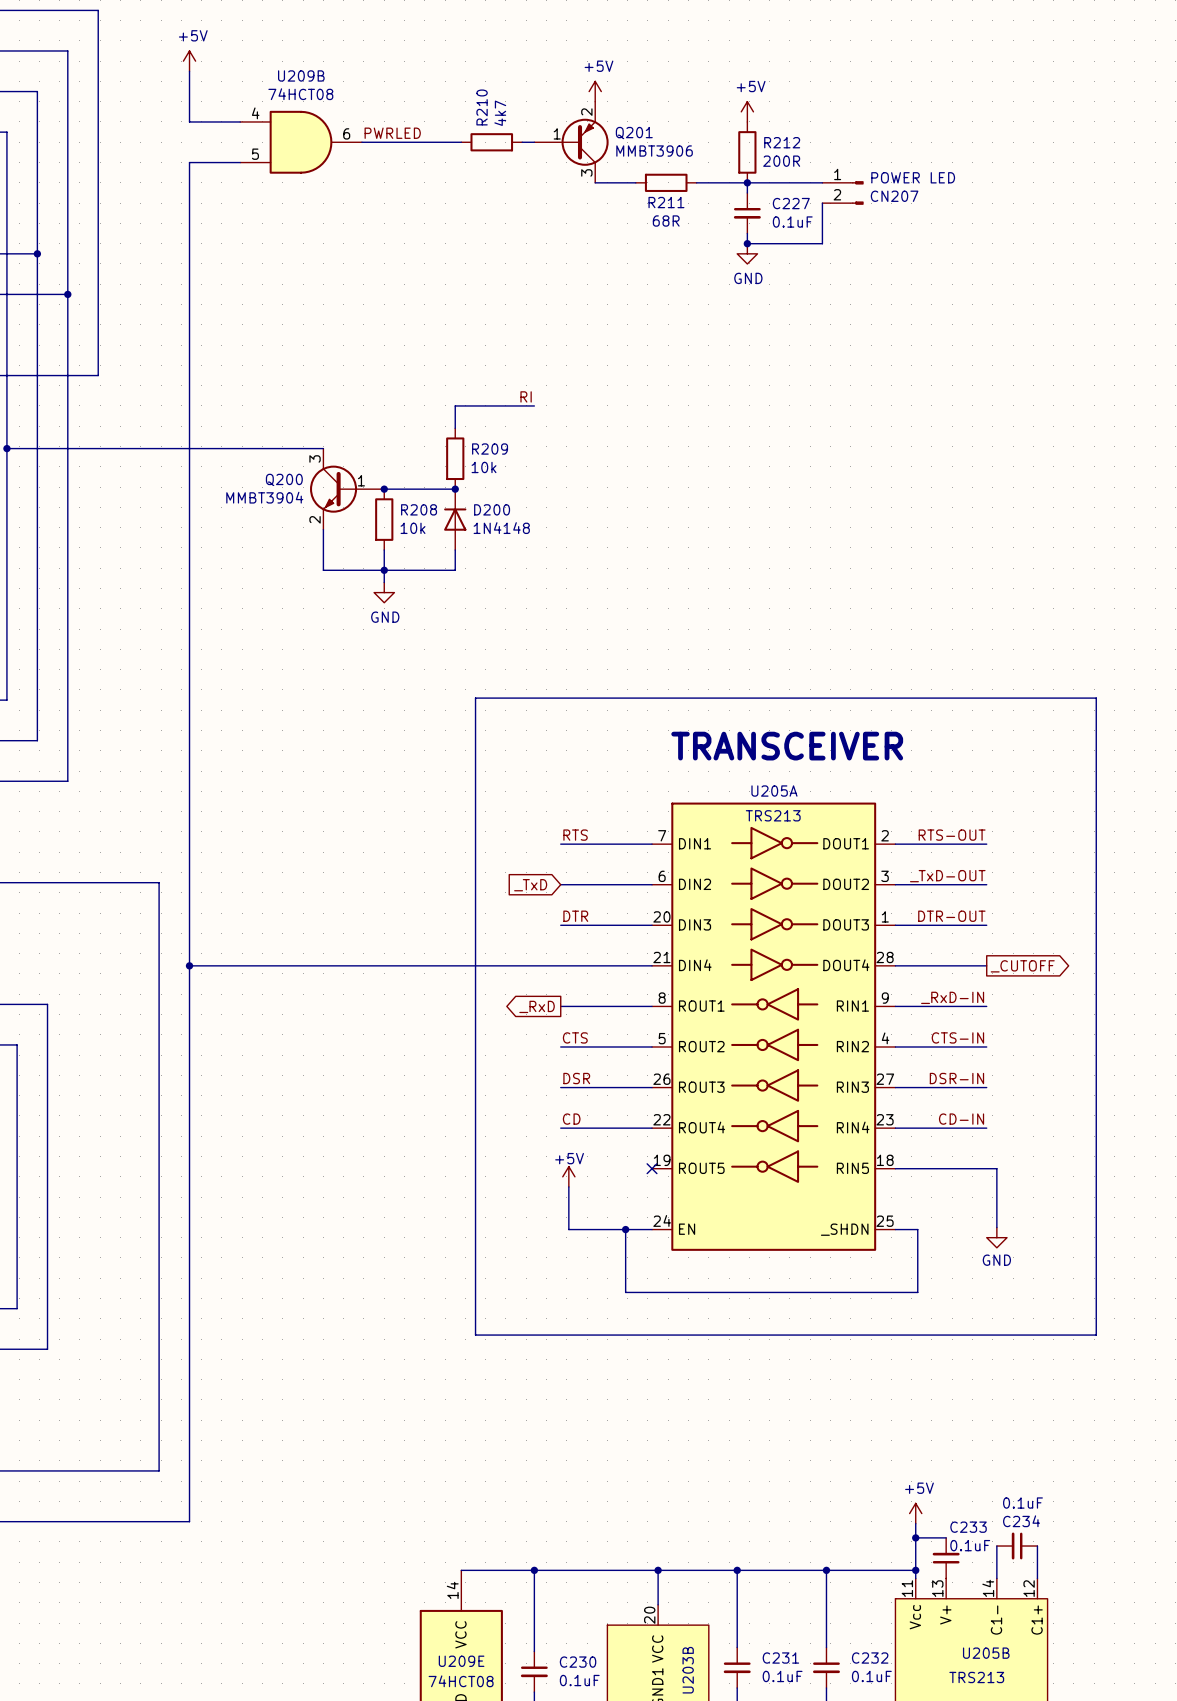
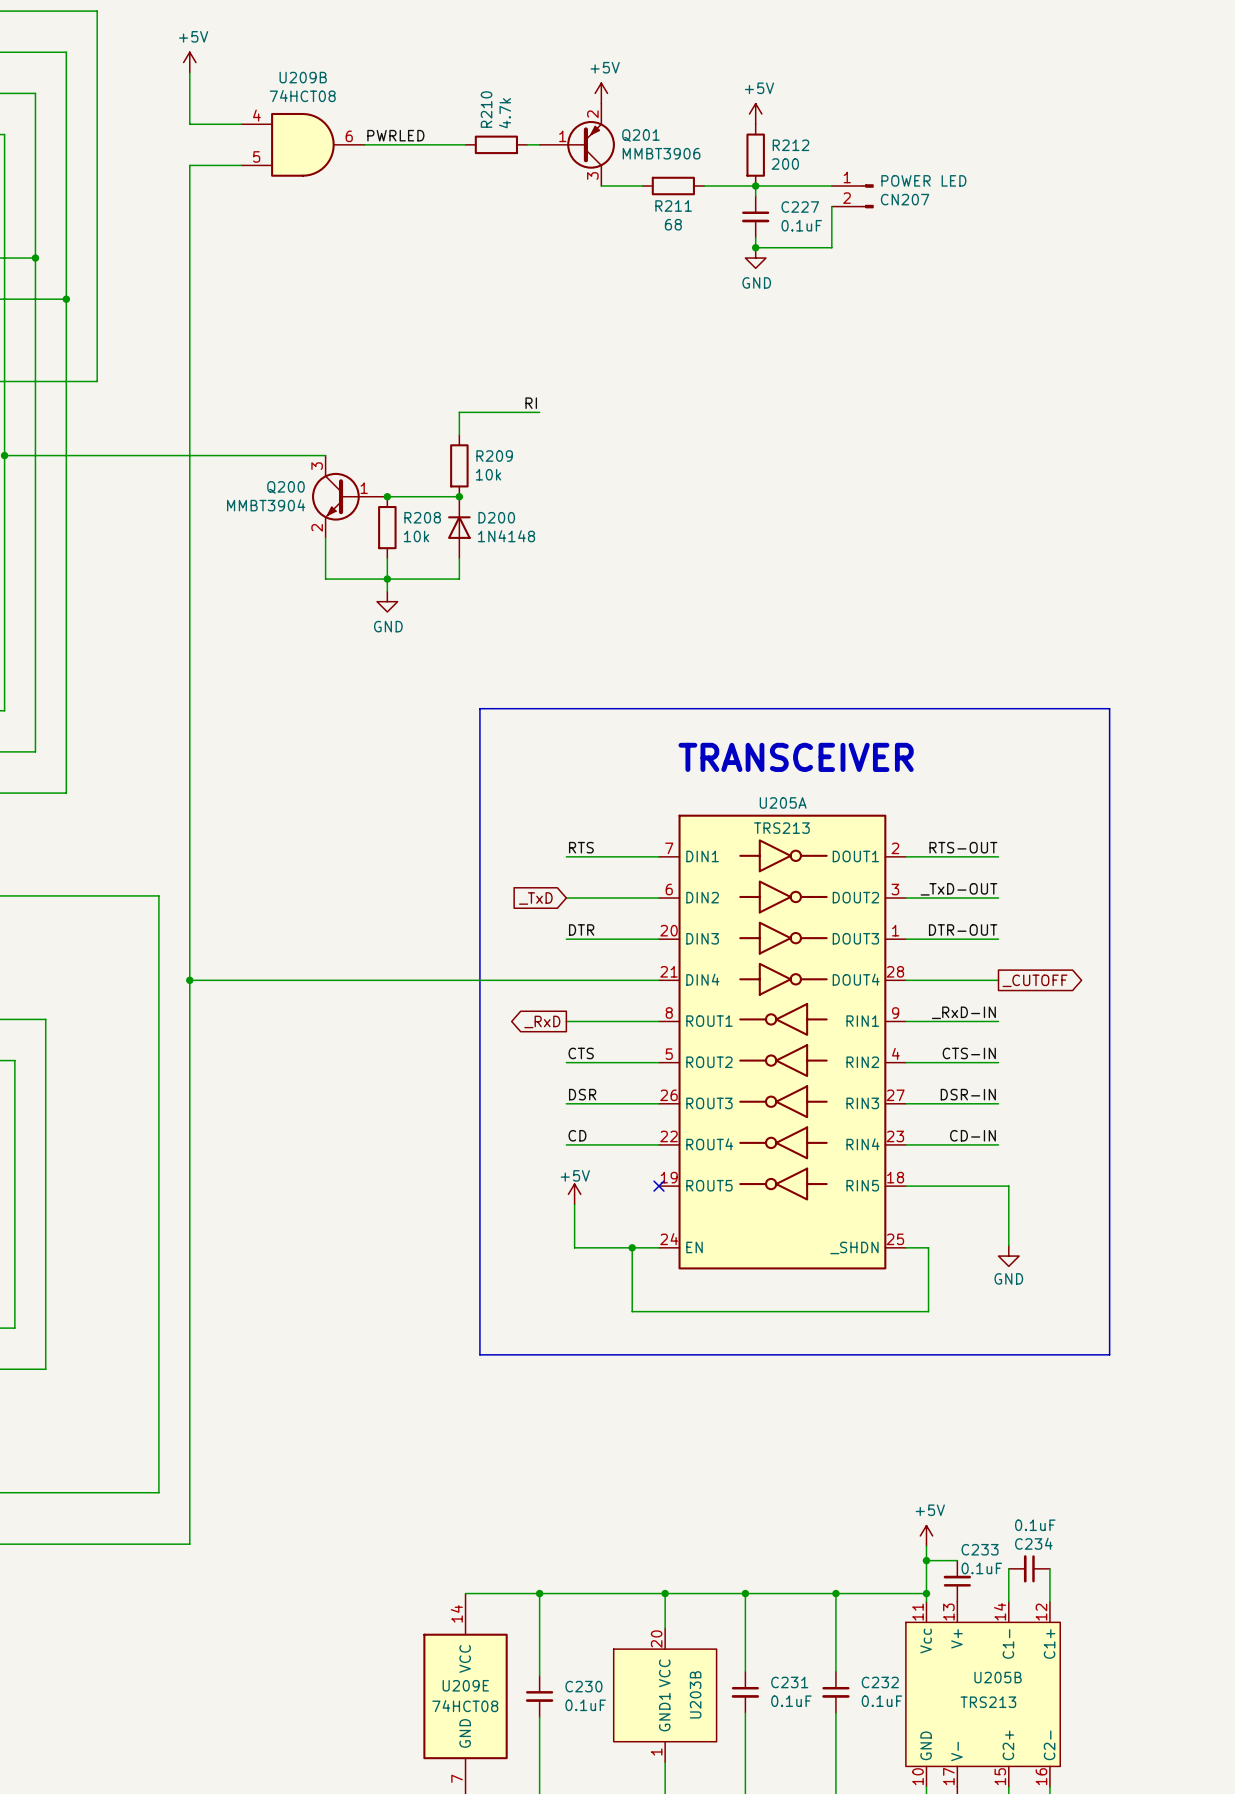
R210 value: 4k7 (500, 113) -> 4.7k (505, 113)
R212 value: 200R (781, 161) -> 200 (785, 164)
R211 value: 68R (666, 221) -> 68 (673, 224)

